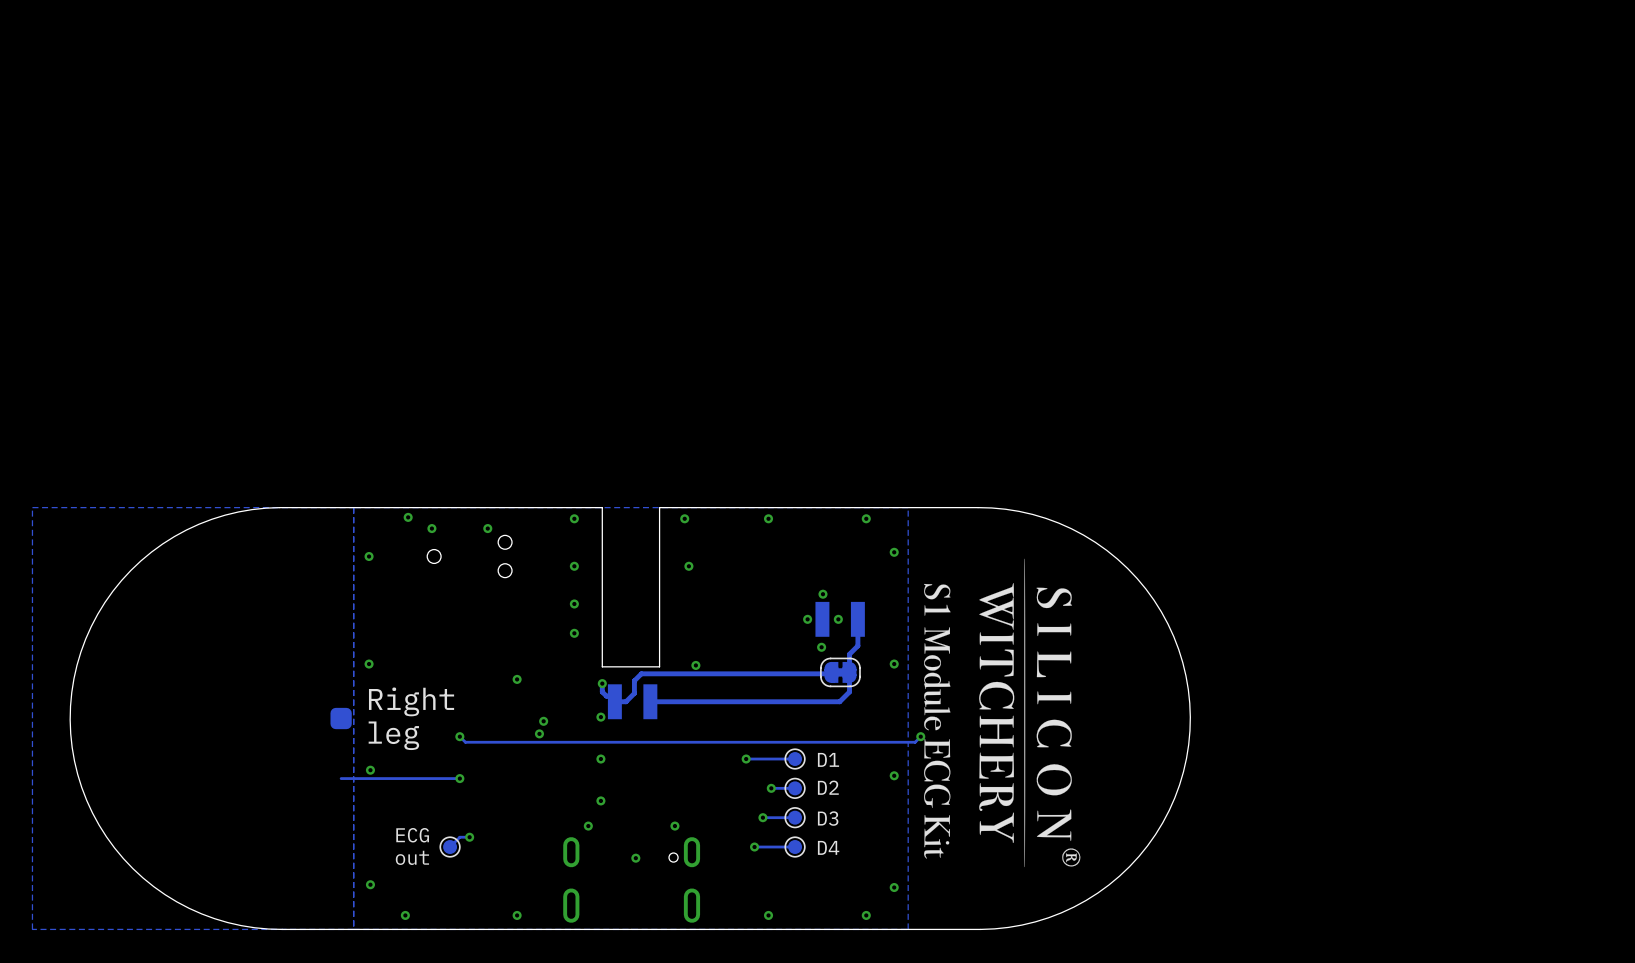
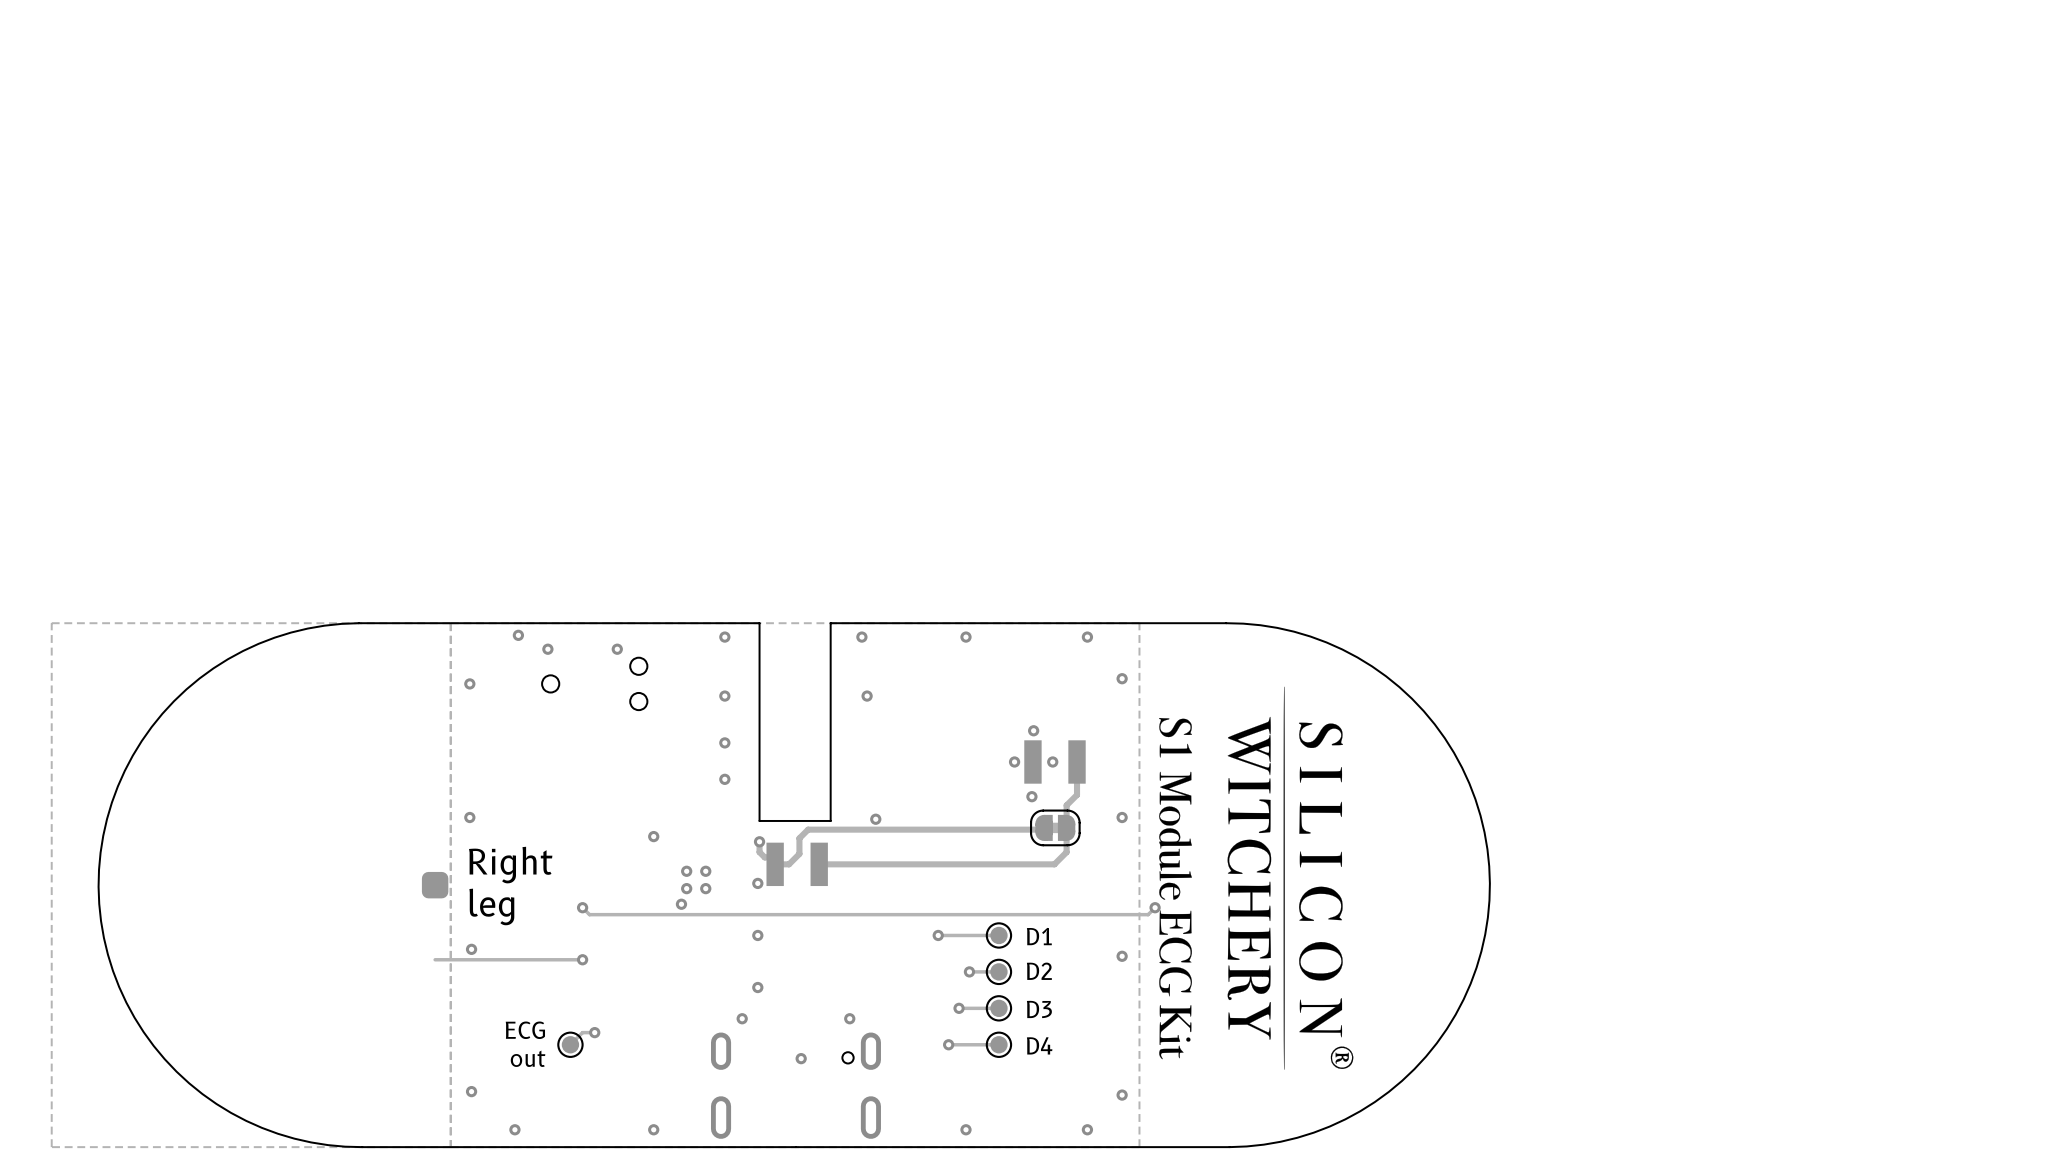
via: none -> (686, 871)
via: none -> (705, 871)
via: none -> (705, 888)

